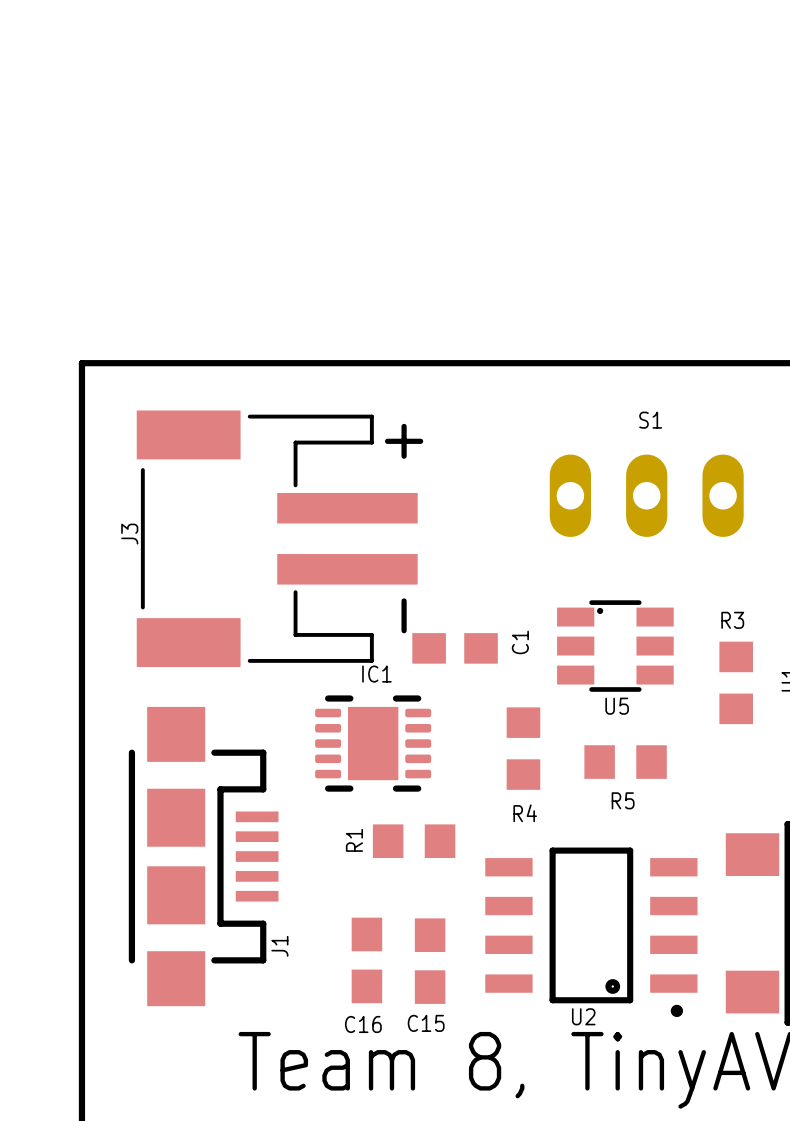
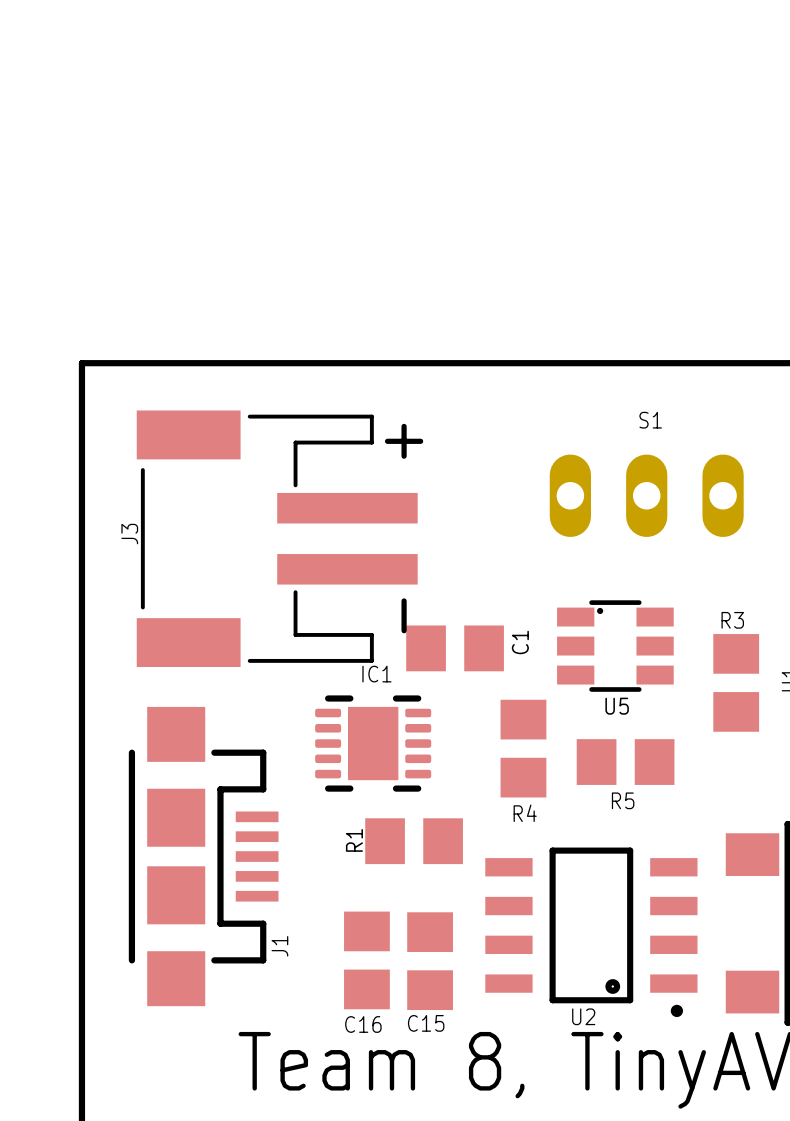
C1 footprint: [412, 633, 498, 664] -> [406, 625, 504, 672]
R3 footprint: [719, 641, 753, 725] -> [713, 634, 760, 732]
R4 footprint: [506, 707, 541, 790] -> [500, 699, 547, 798]
R5 footprint: [584, 745, 667, 779] -> [576, 739, 675, 785]
R1 footprint: [372, 824, 456, 858] -> [365, 818, 463, 865]
C16 footprint: [351, 917, 383, 1004] -> [344, 911, 390, 1010]
C15 footprint: [414, 918, 446, 1004] -> [407, 912, 453, 1011]

